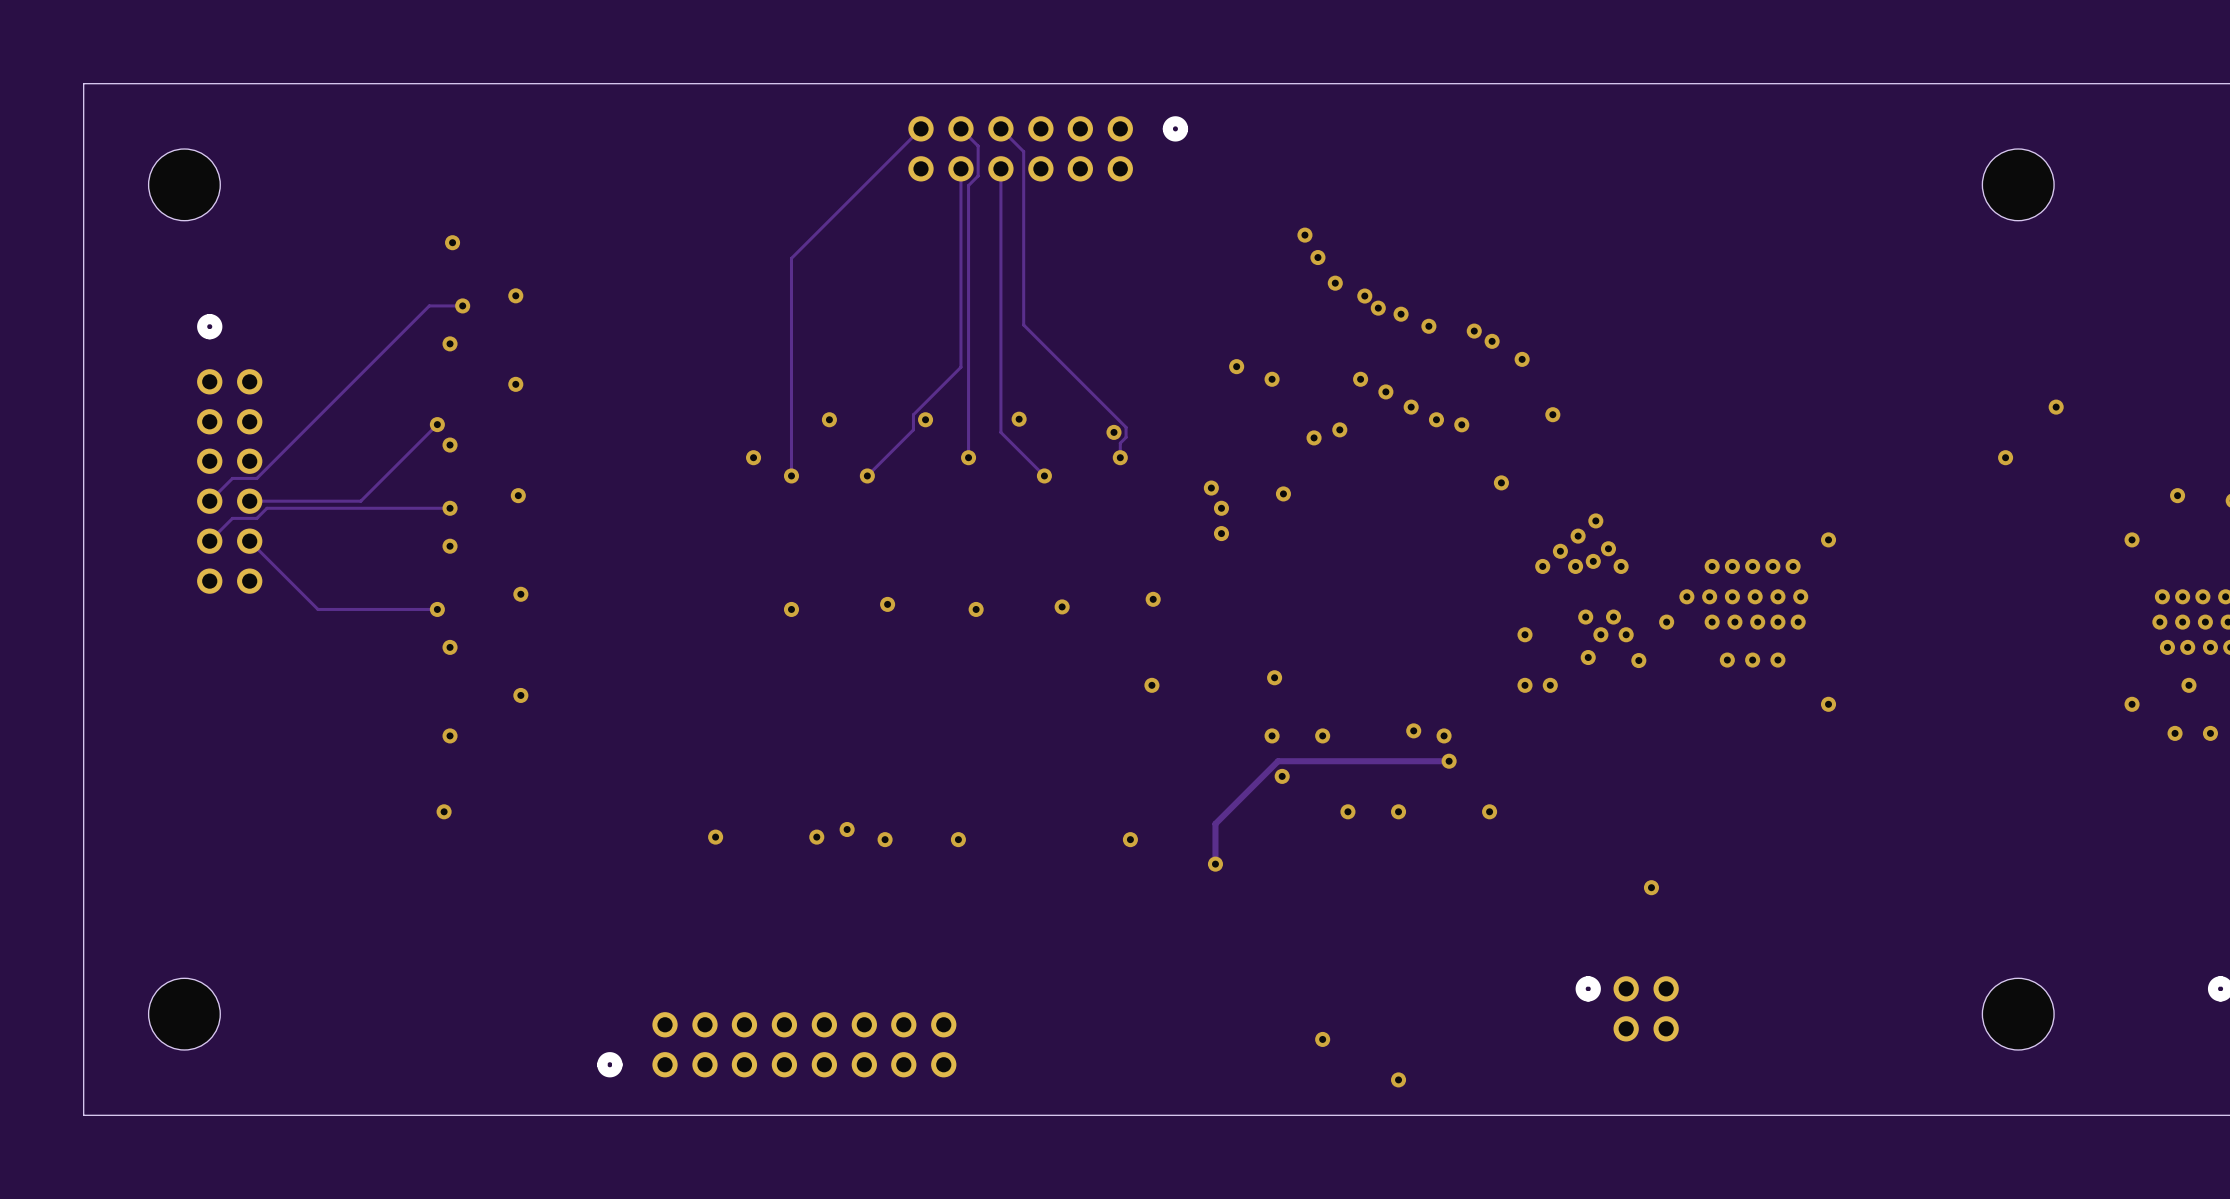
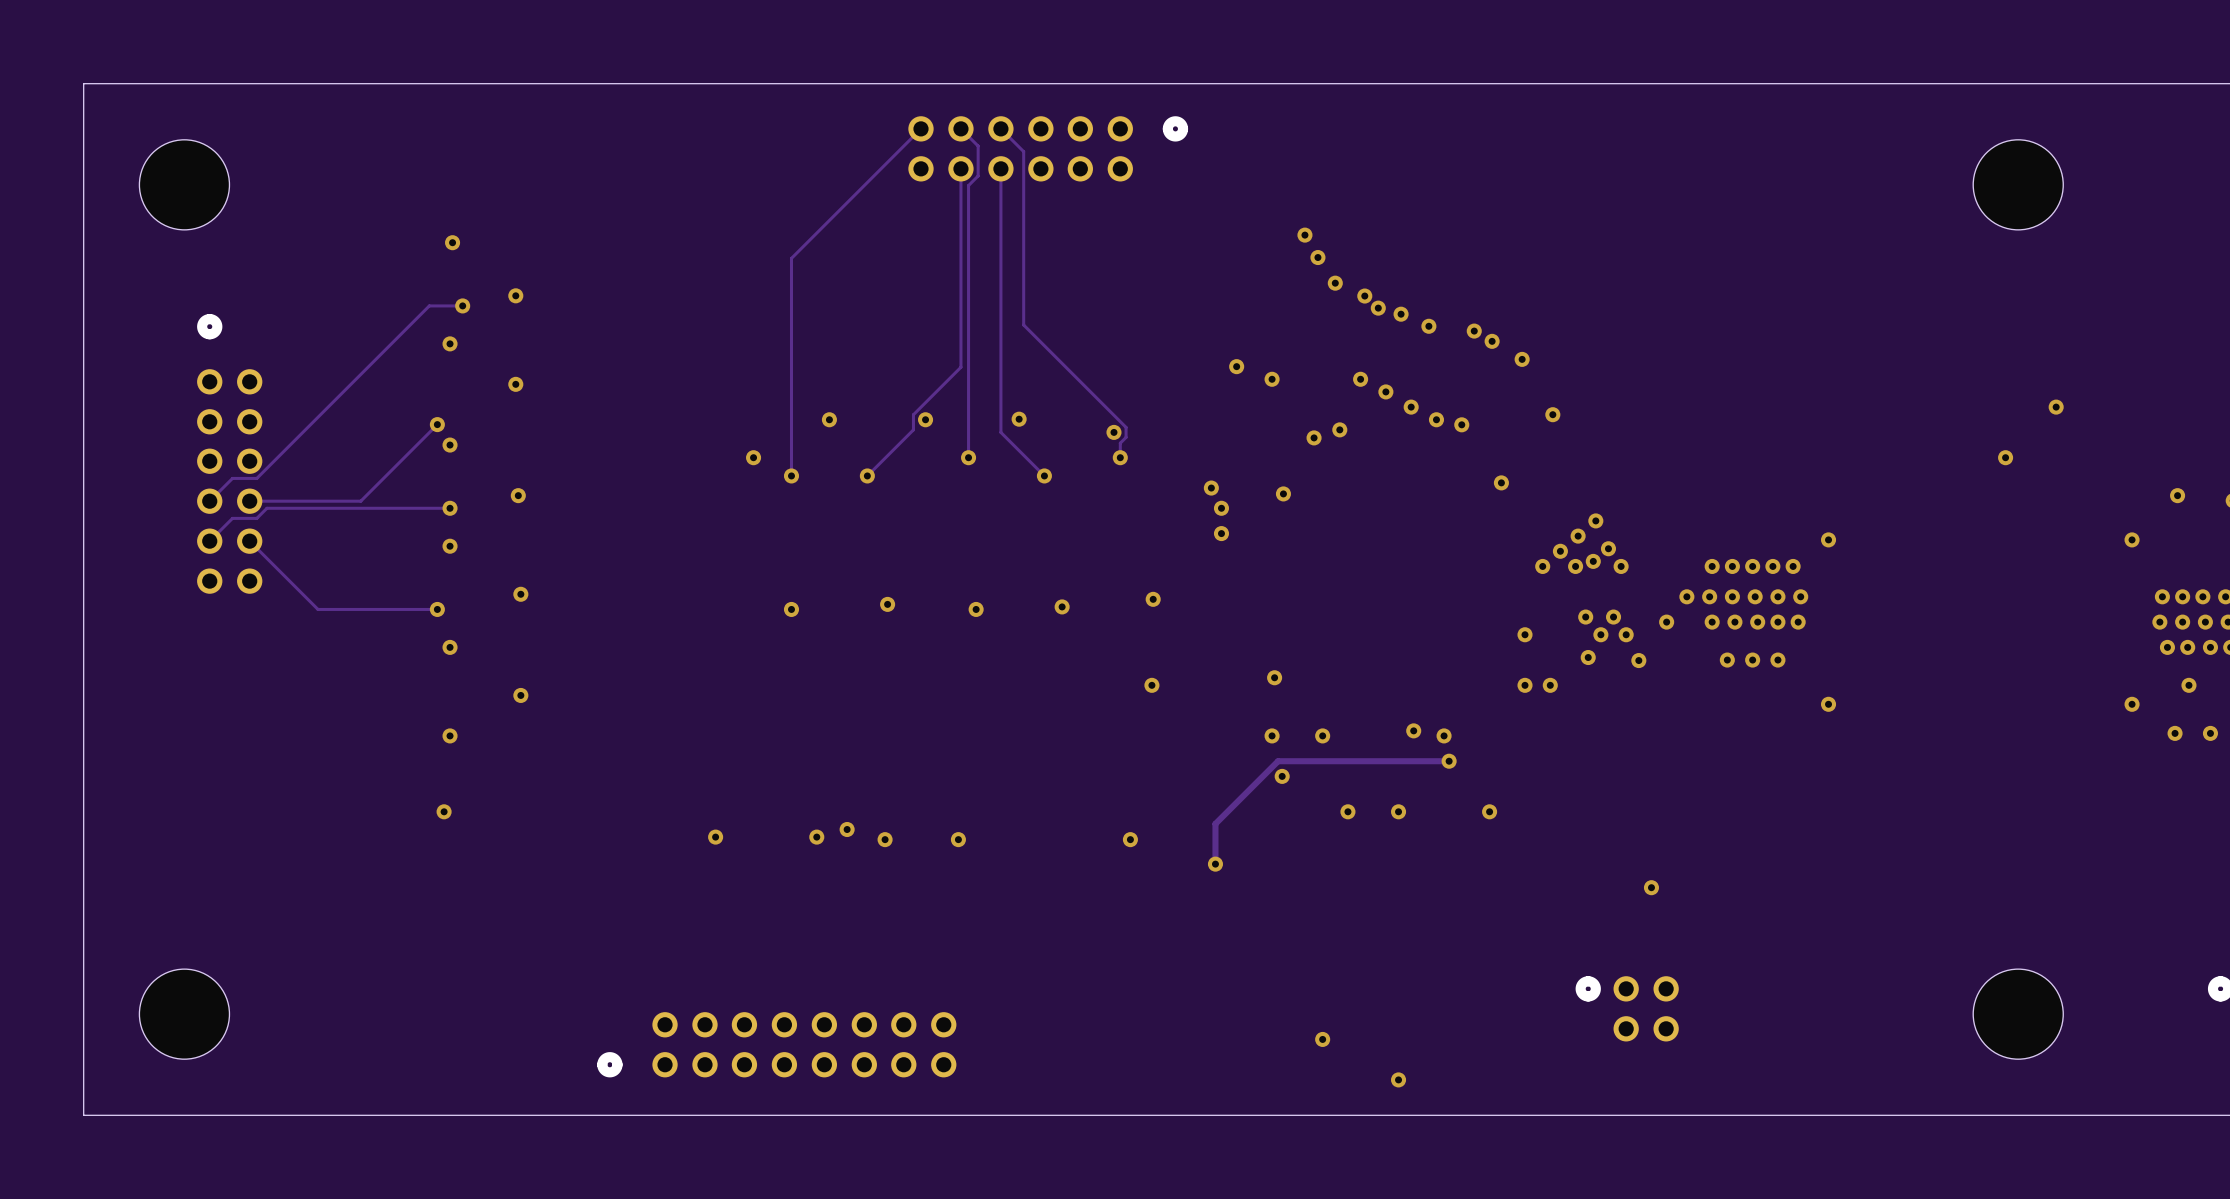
hole size: [148, 149, 221, 221] -> [139, 139, 230, 230]
hole size: [1982, 149, 2055, 221] -> [1973, 139, 2064, 230]
hole size: [148, 978, 221, 1050] -> [139, 969, 230, 1060]
hole size: [1982, 978, 2055, 1050] -> [1973, 969, 2064, 1060]

